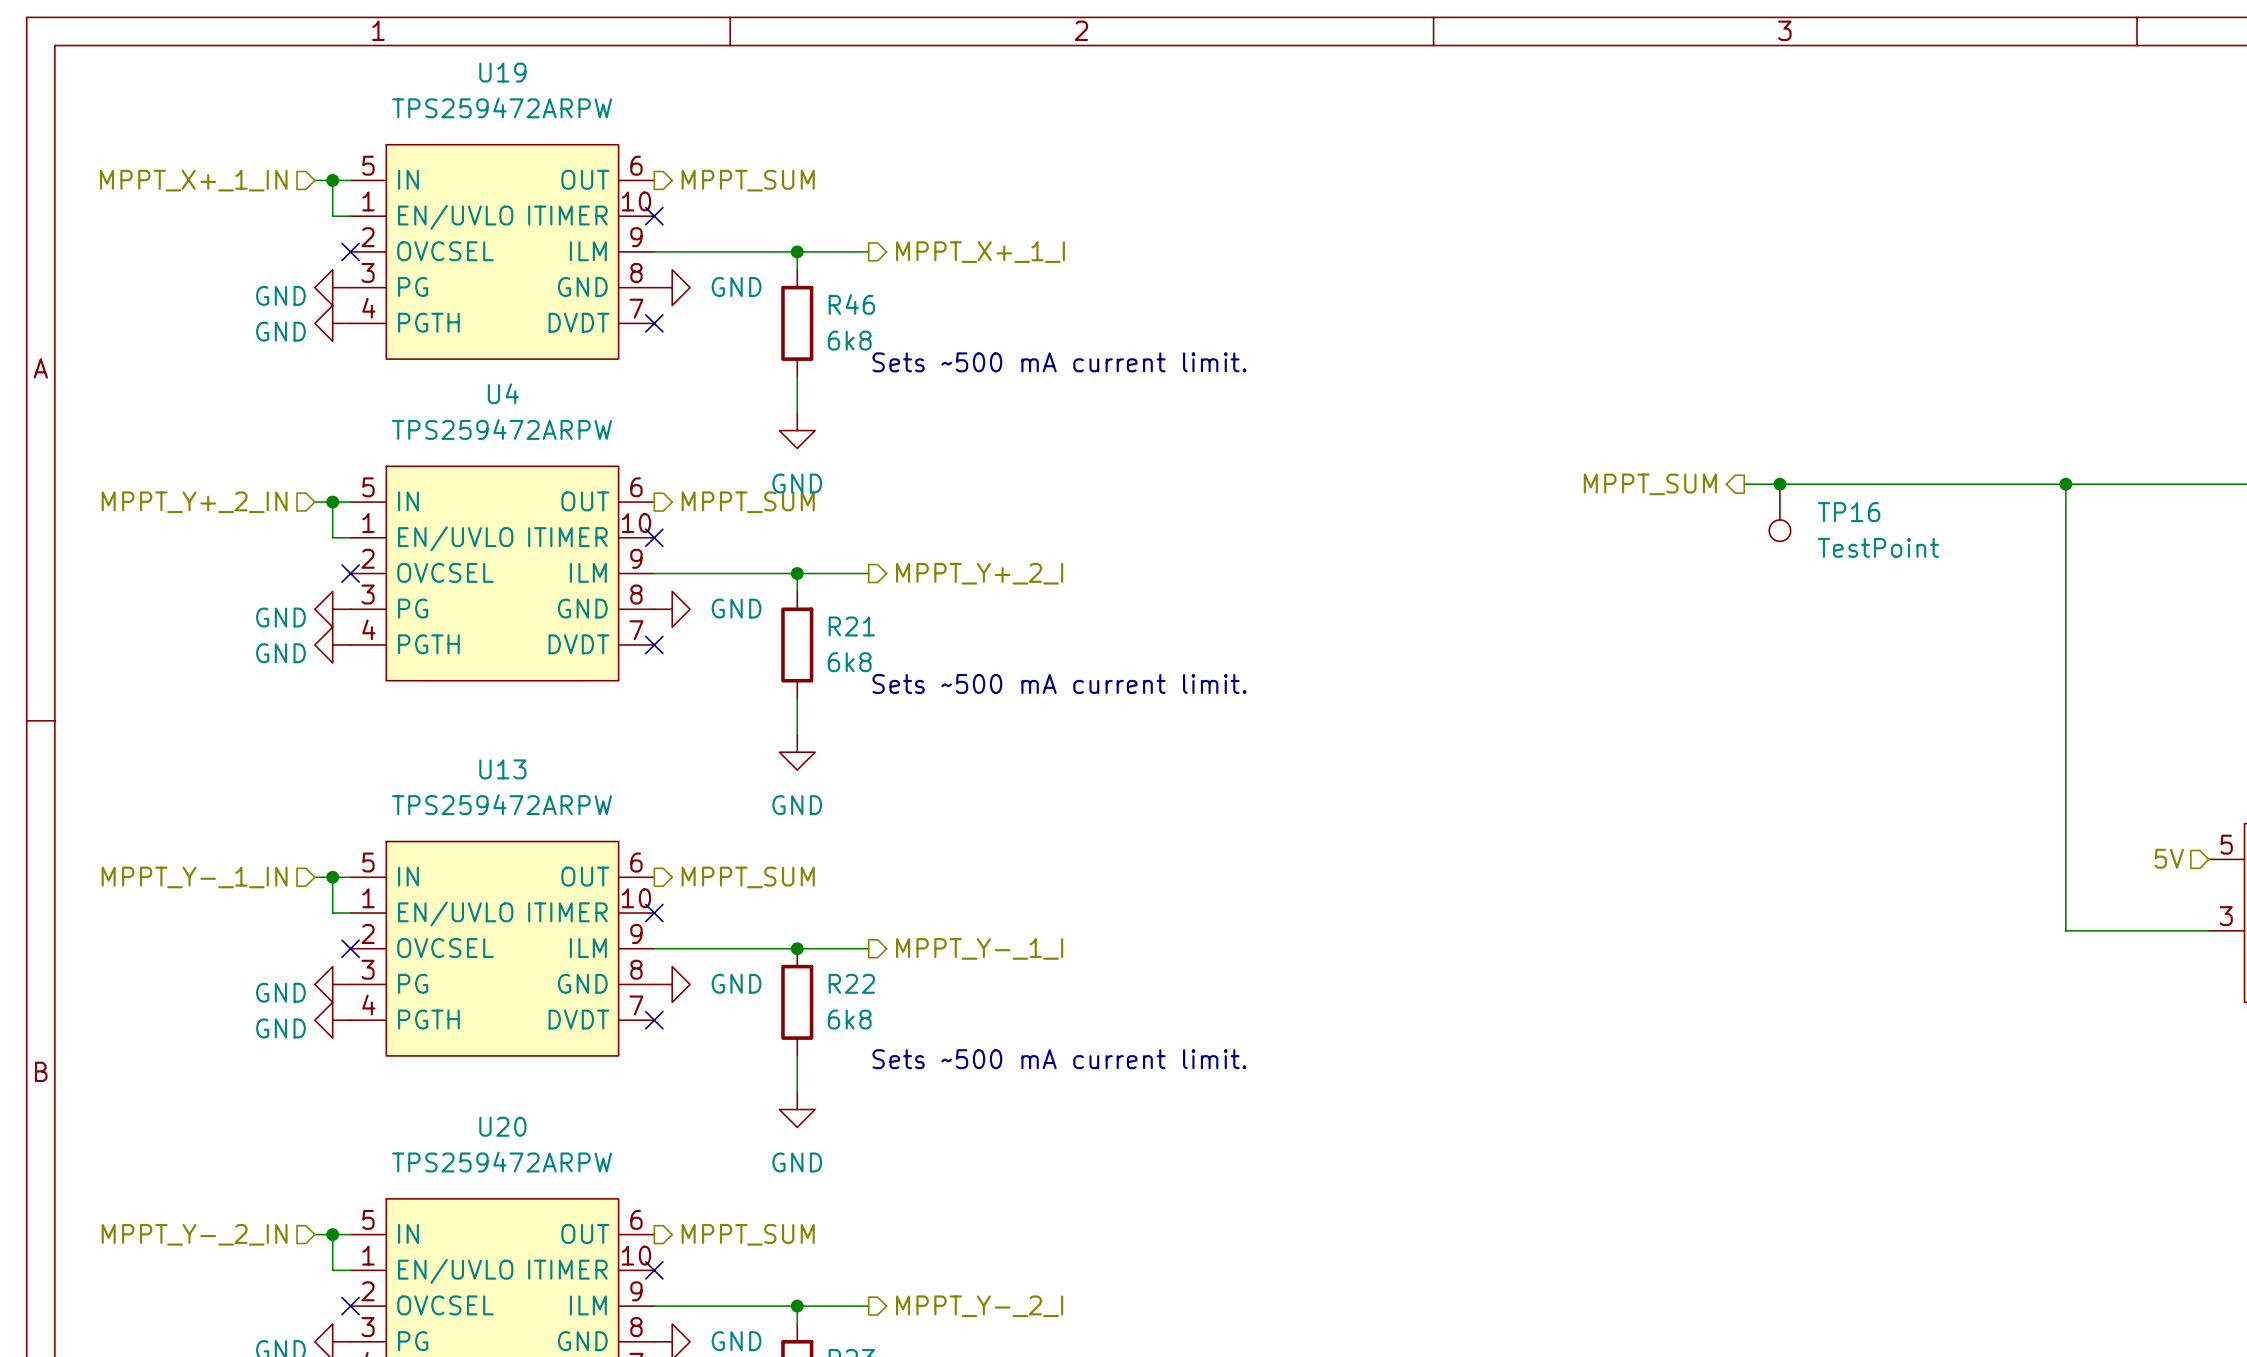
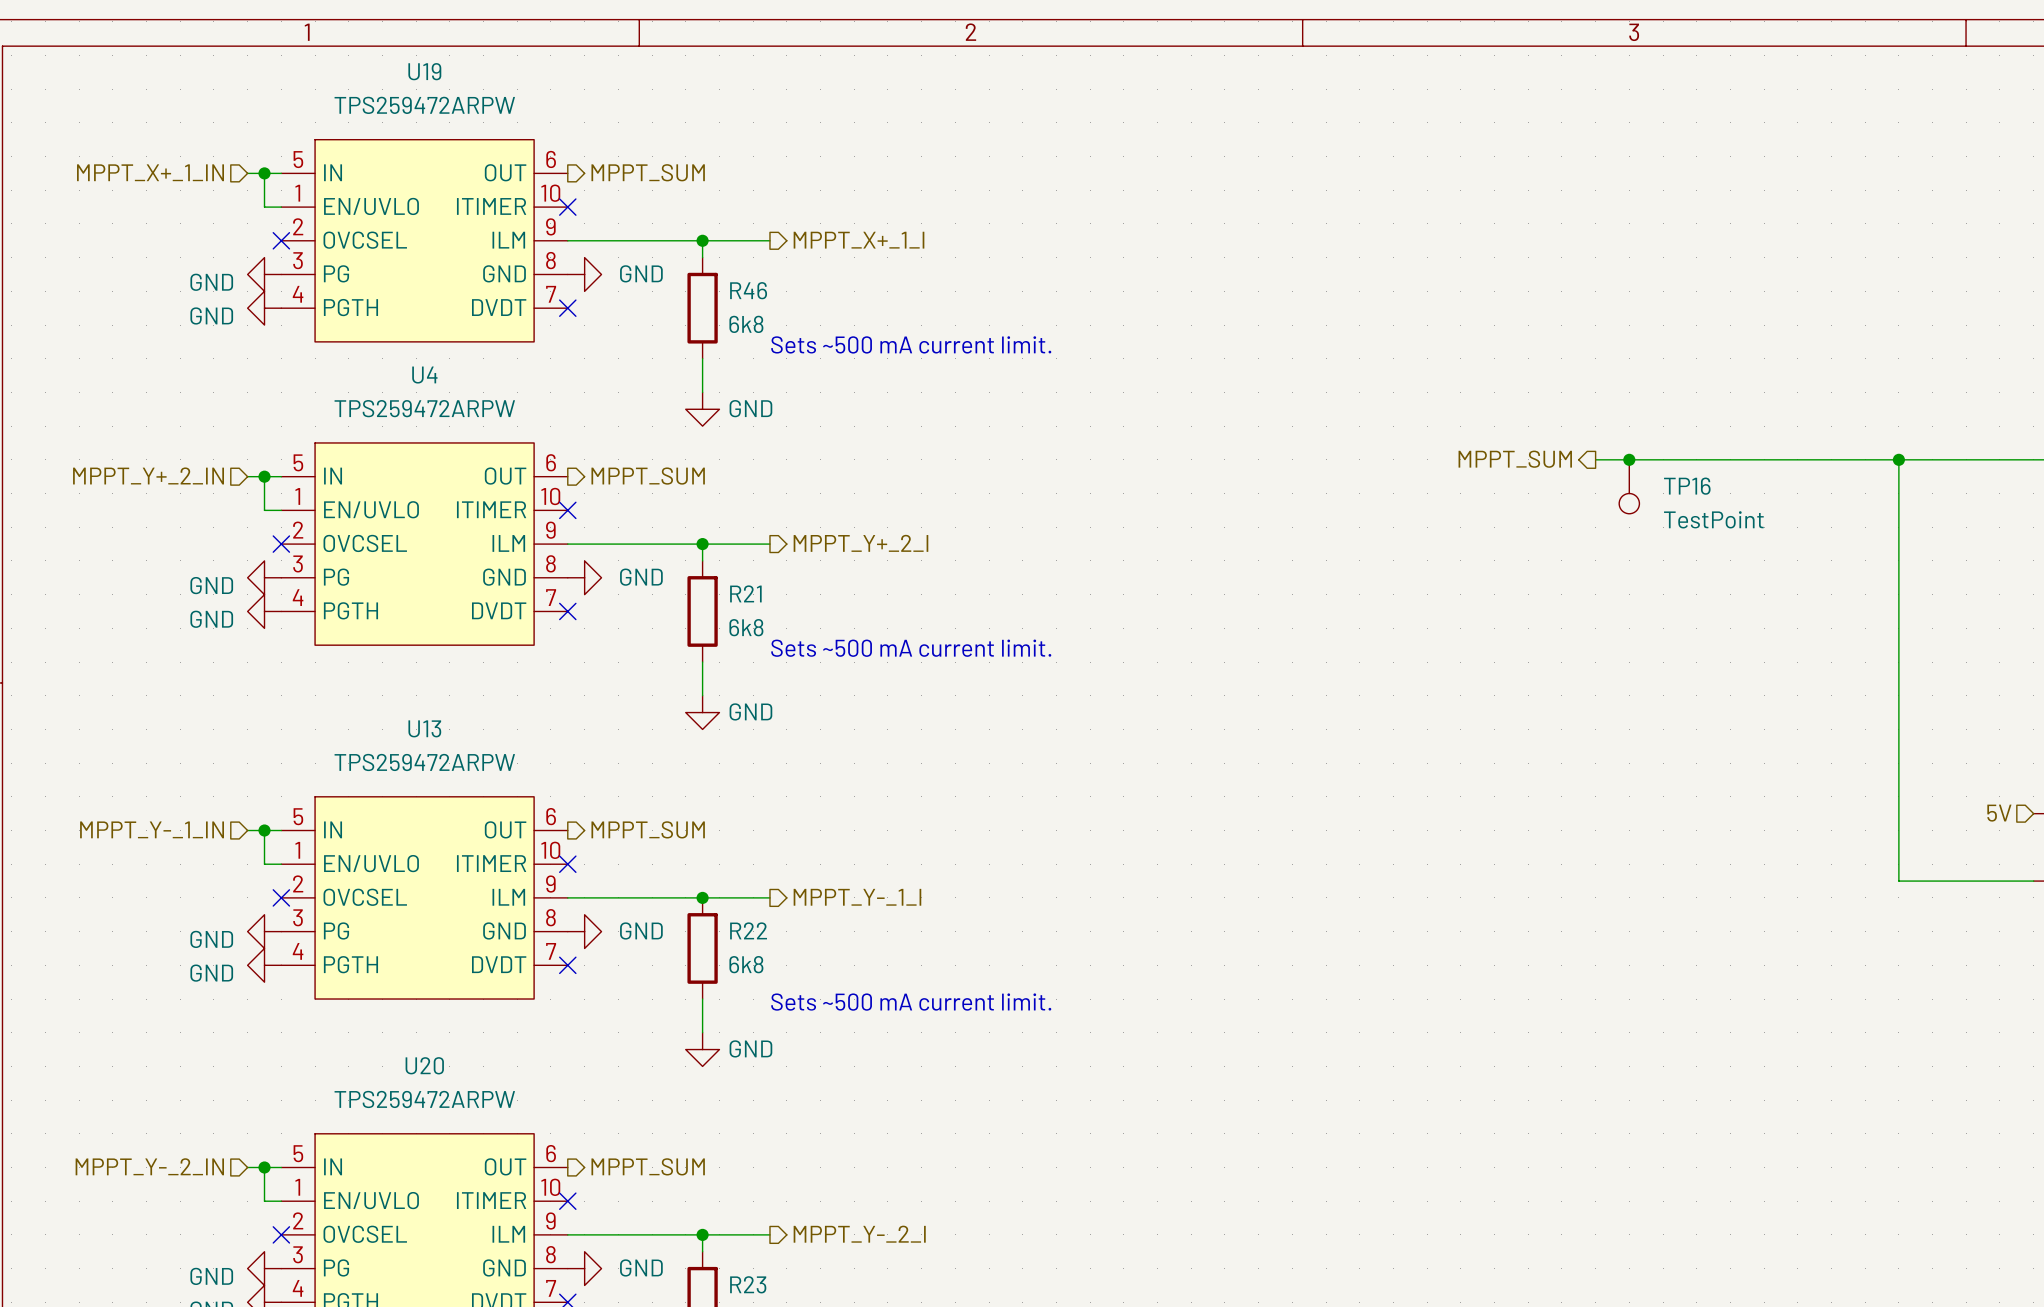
power symbol text position: GND (797, 483) -> GND (750, 408)
power symbol text position: GND (797, 805) -> GND (750, 711)
power symbol text position: GND (797, 1162) -> GND (750, 1048)

